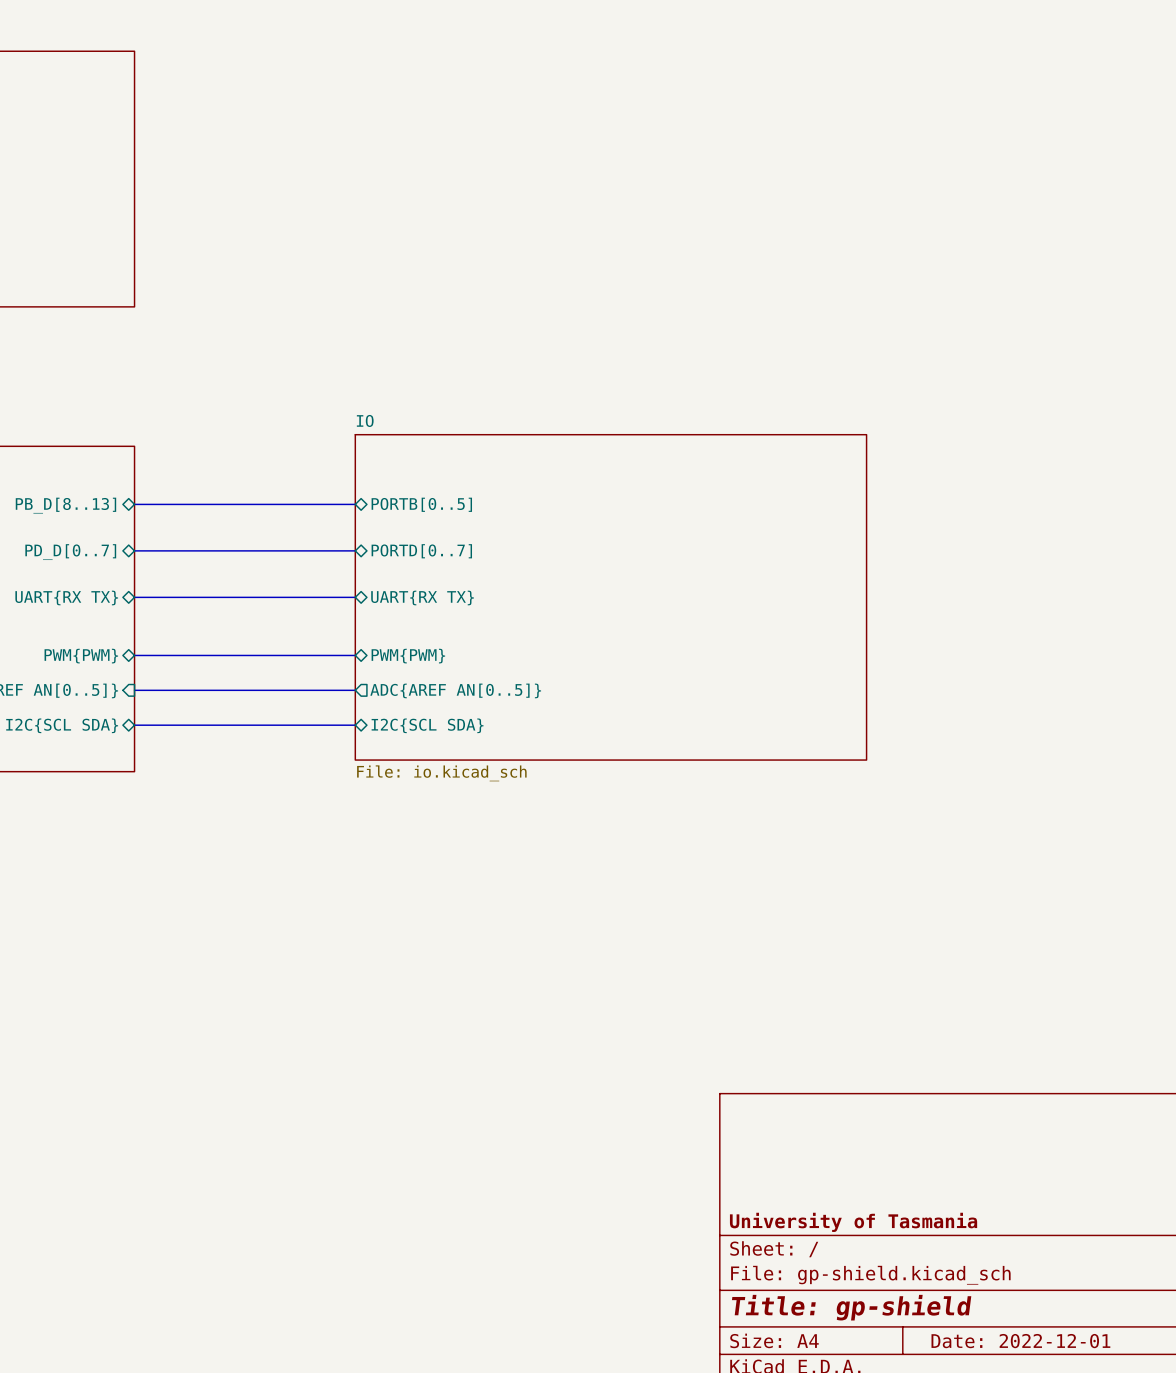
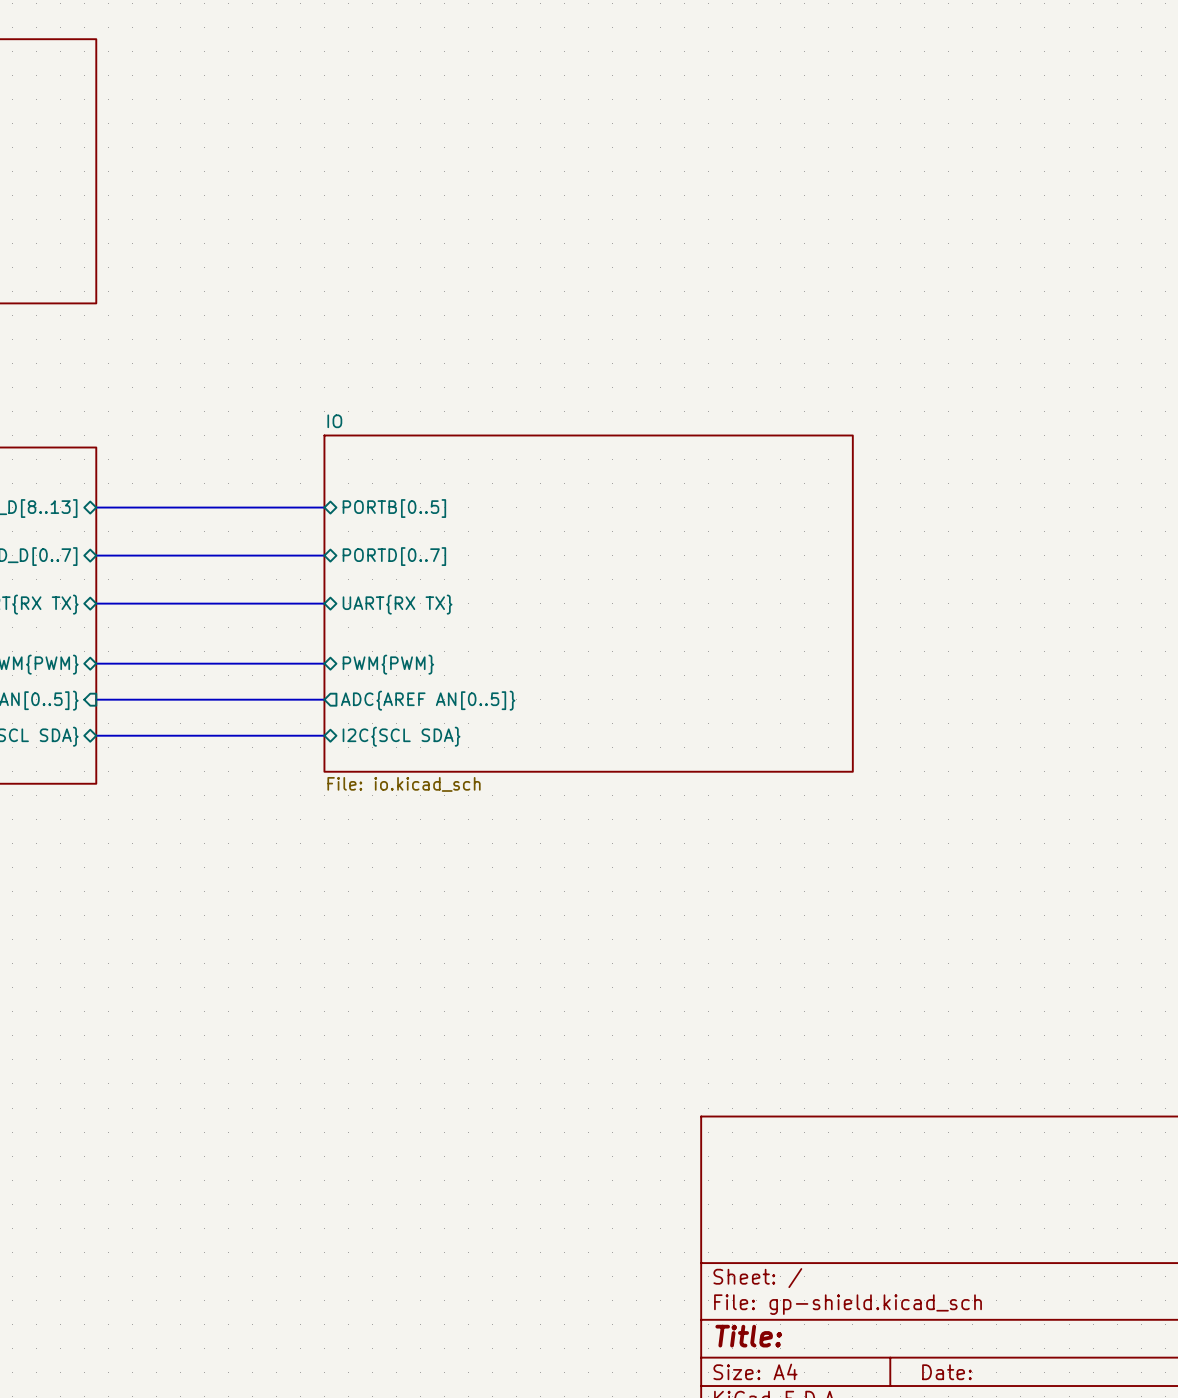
title block: University of Tasmania (853, 1222) -> none
title block: Title: gp-shield (851, 1307) -> Title: (748, 1336)
title block: Date: 2022-12-01 (1020, 1341) -> Date: (946, 1372)

